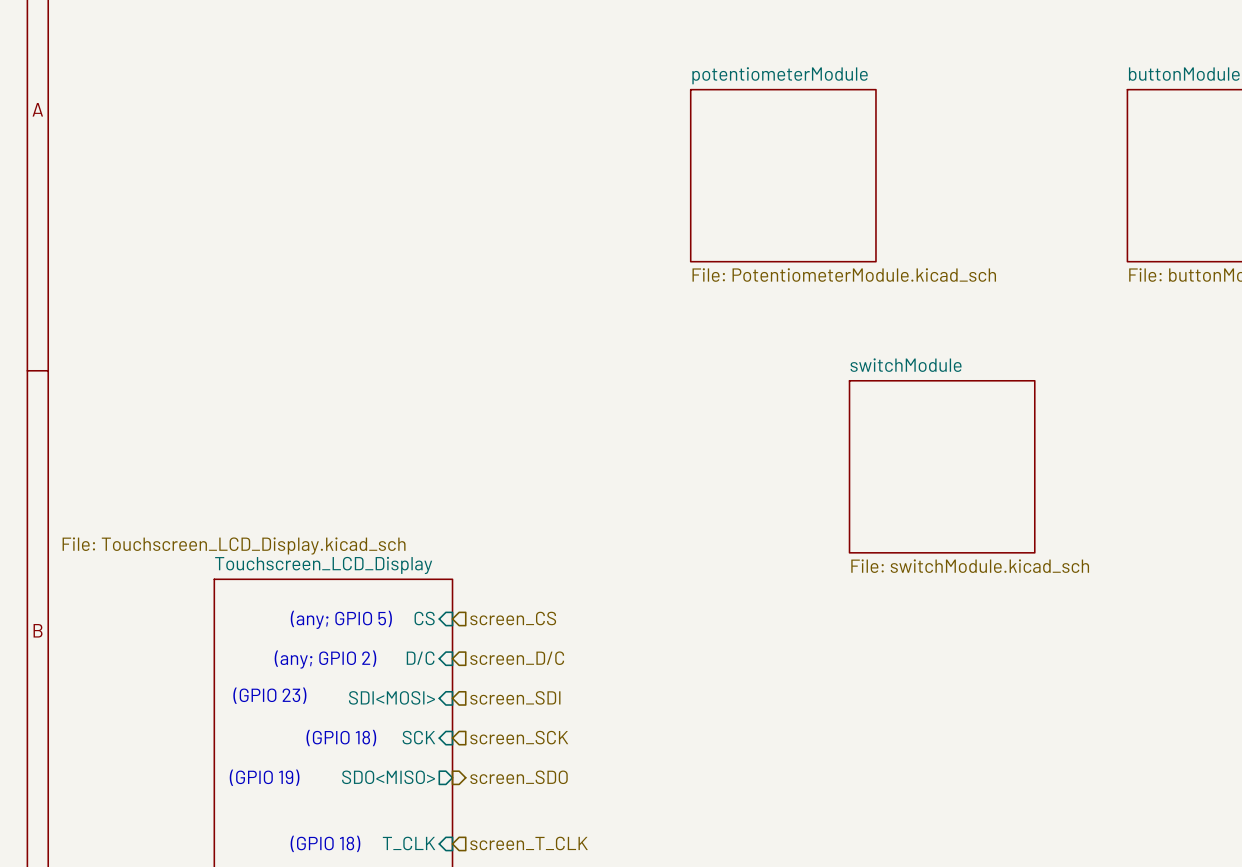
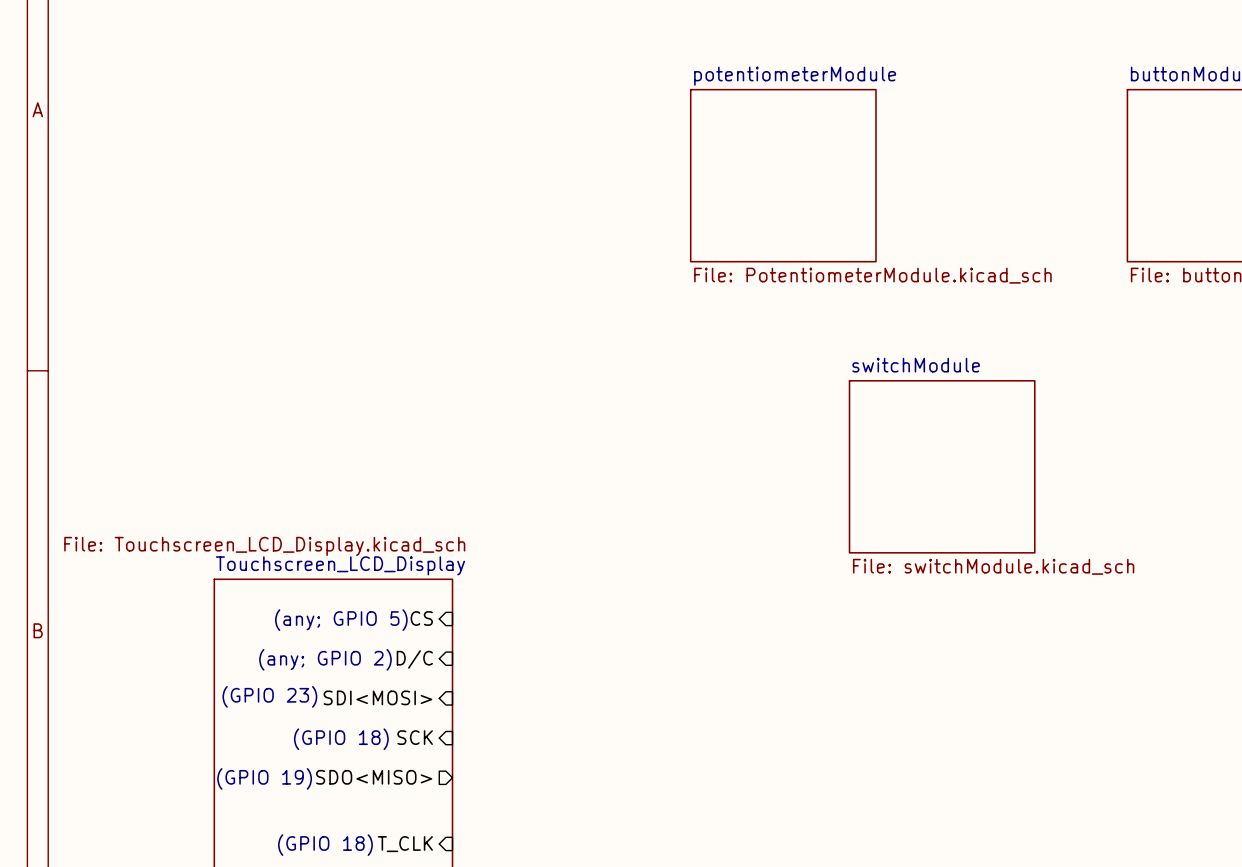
hierarchical label: screen_CS (513, 618) -> none
hierarchical label: screen_D/C (517, 658) -> none
hierarchical label: screen_SDI (515, 697) -> none
hierarchical label: screen_SCK (519, 737) -> none
hierarchical label: screen_SDO (519, 777) -> none
hierarchical label: screen_T_CLK (529, 843) -> none

